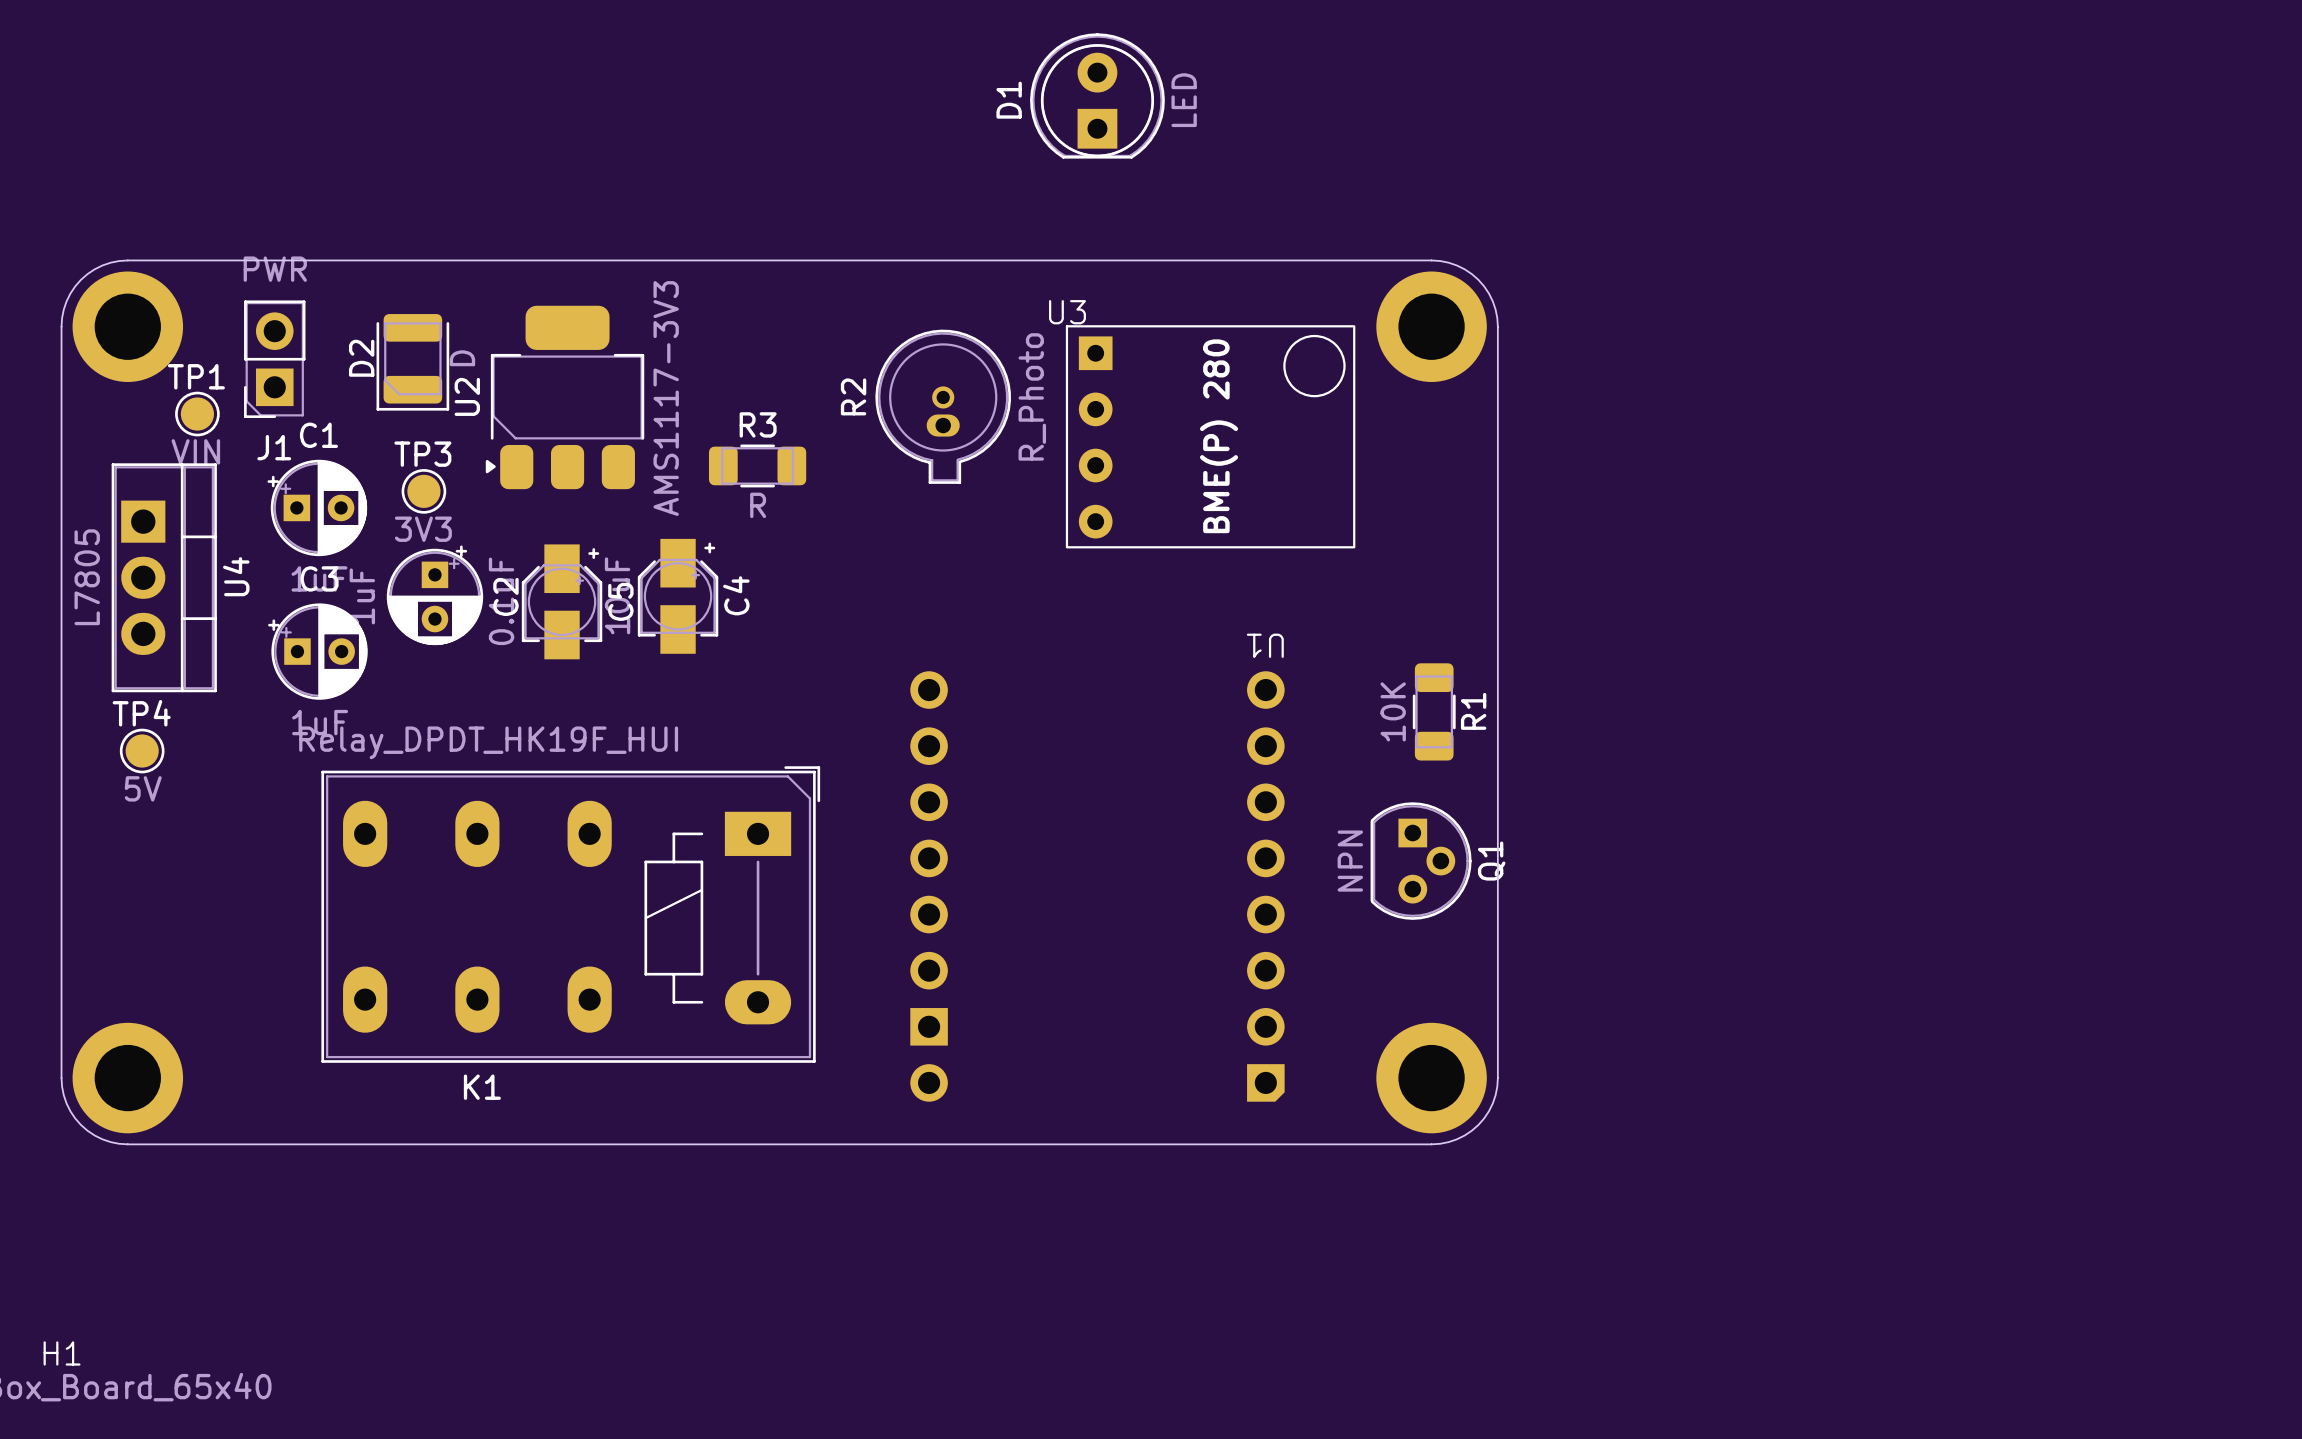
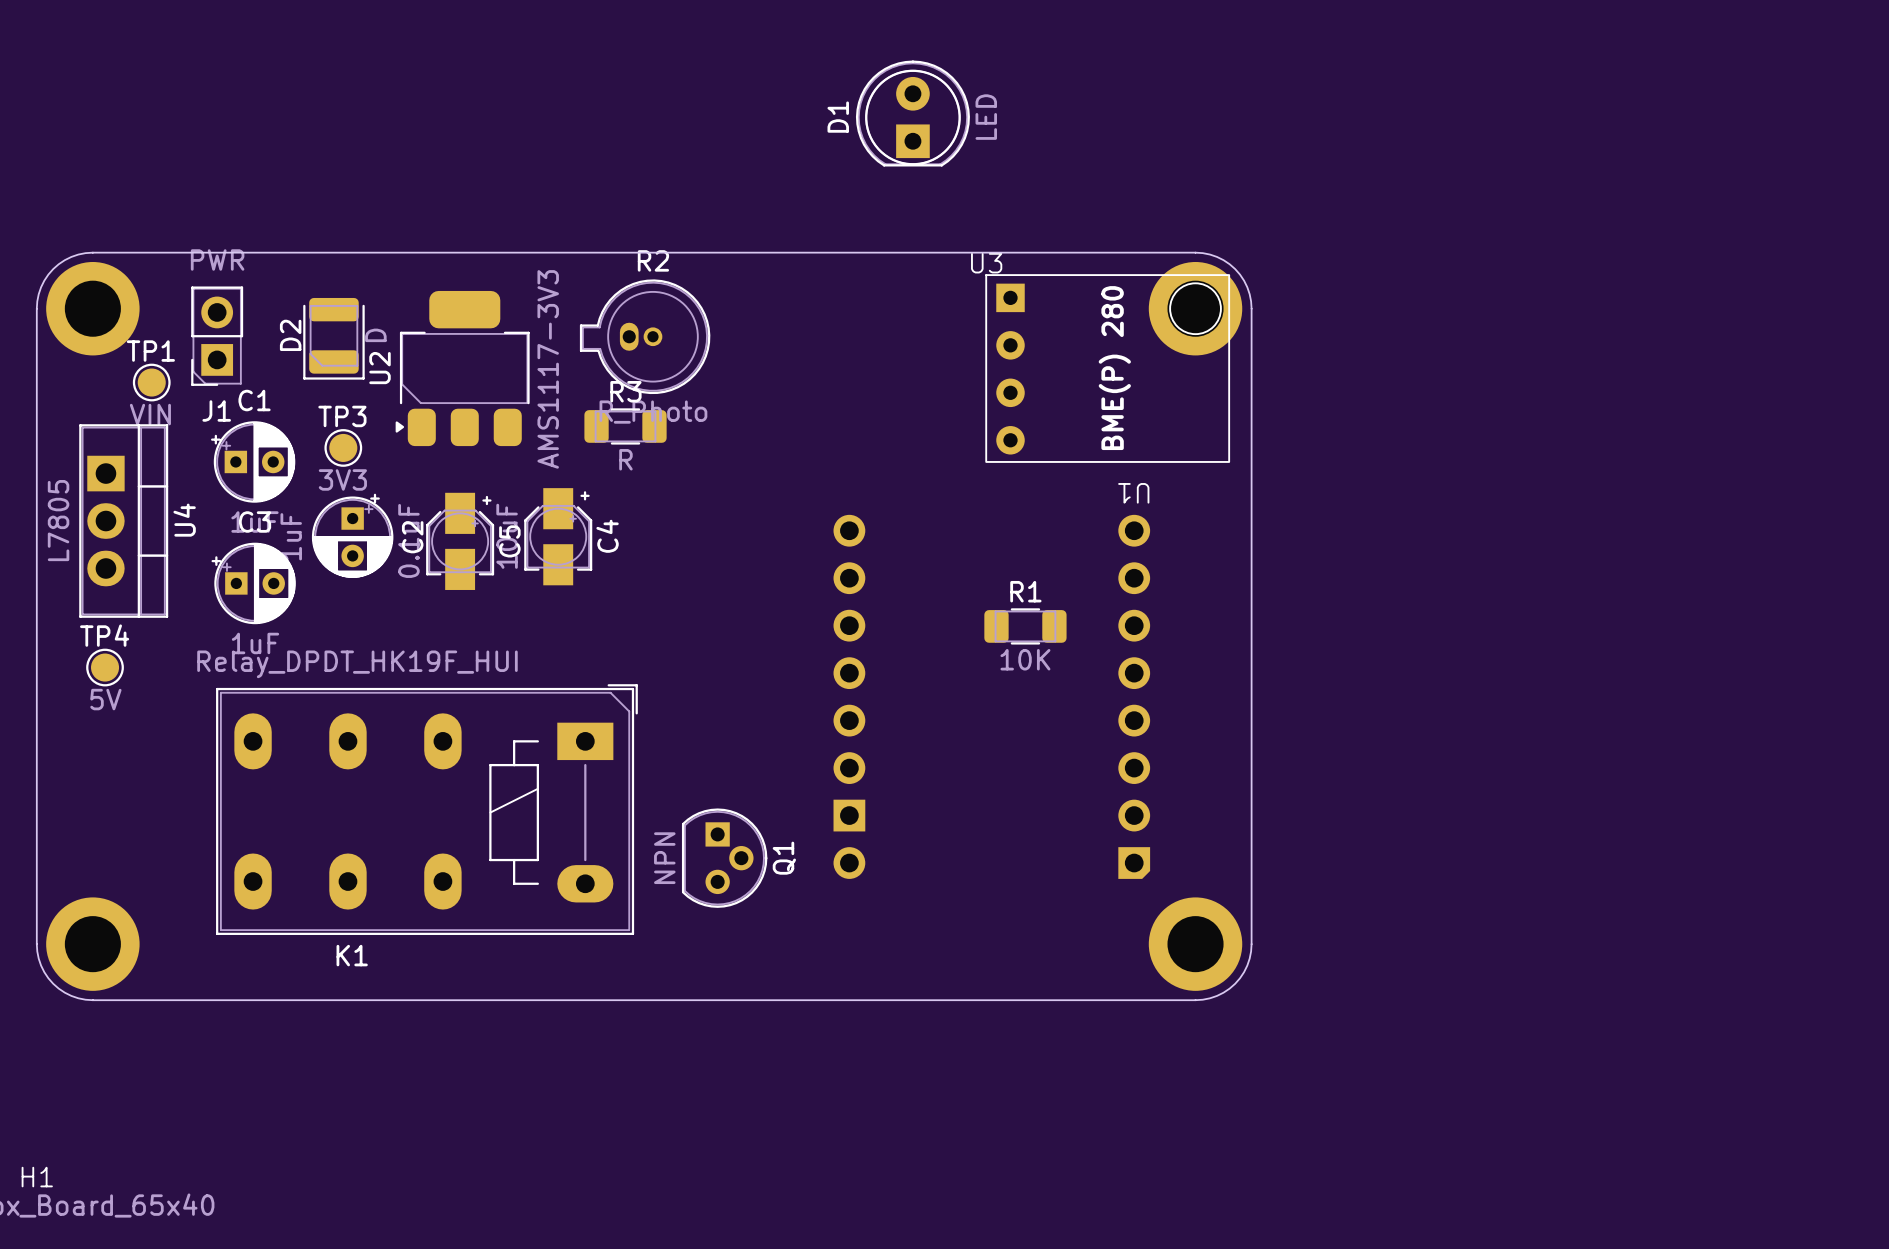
R2 rotation: 0° (943, 406) -> 90° clockwise (645, 336)
R2 position: (943, 406) -> (645, 336)
U3 position: (1210, 436) -> (1107, 368)
R1 value position: 10K (1393, 711) -> 10K (1025, 659)
R1 rotation: 0° (1434, 711) -> 90° clockwise (1025, 626)
R1 position: (1434, 711) -> (1025, 626)
R1 name position: R1 (1473, 711) -> R1 (1025, 591)
Q1 position: (1421, 861) -> (724, 858)
U1 position: (1097, 886) -> (991, 696)
K1 position: (570, 914) -> (426, 809)

